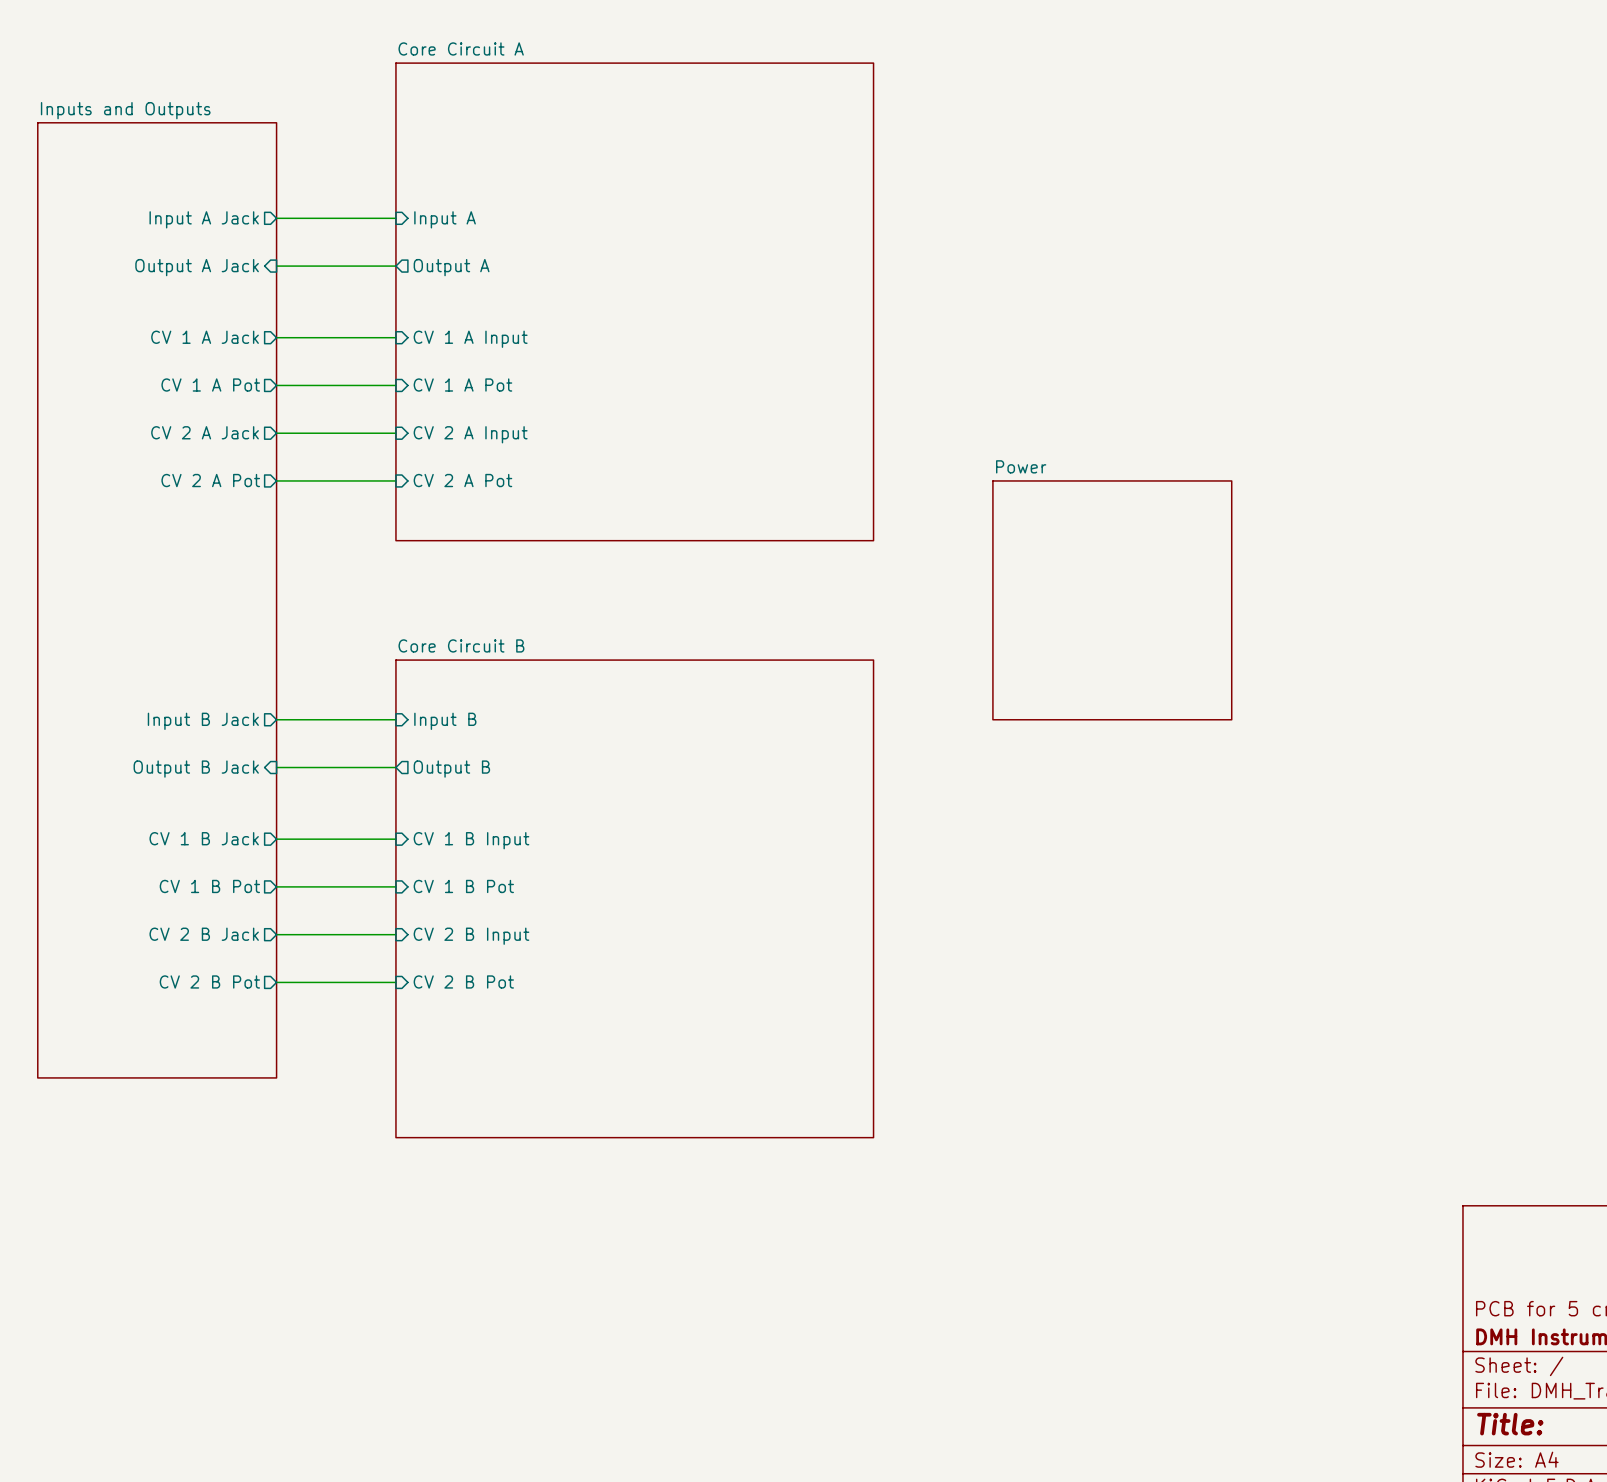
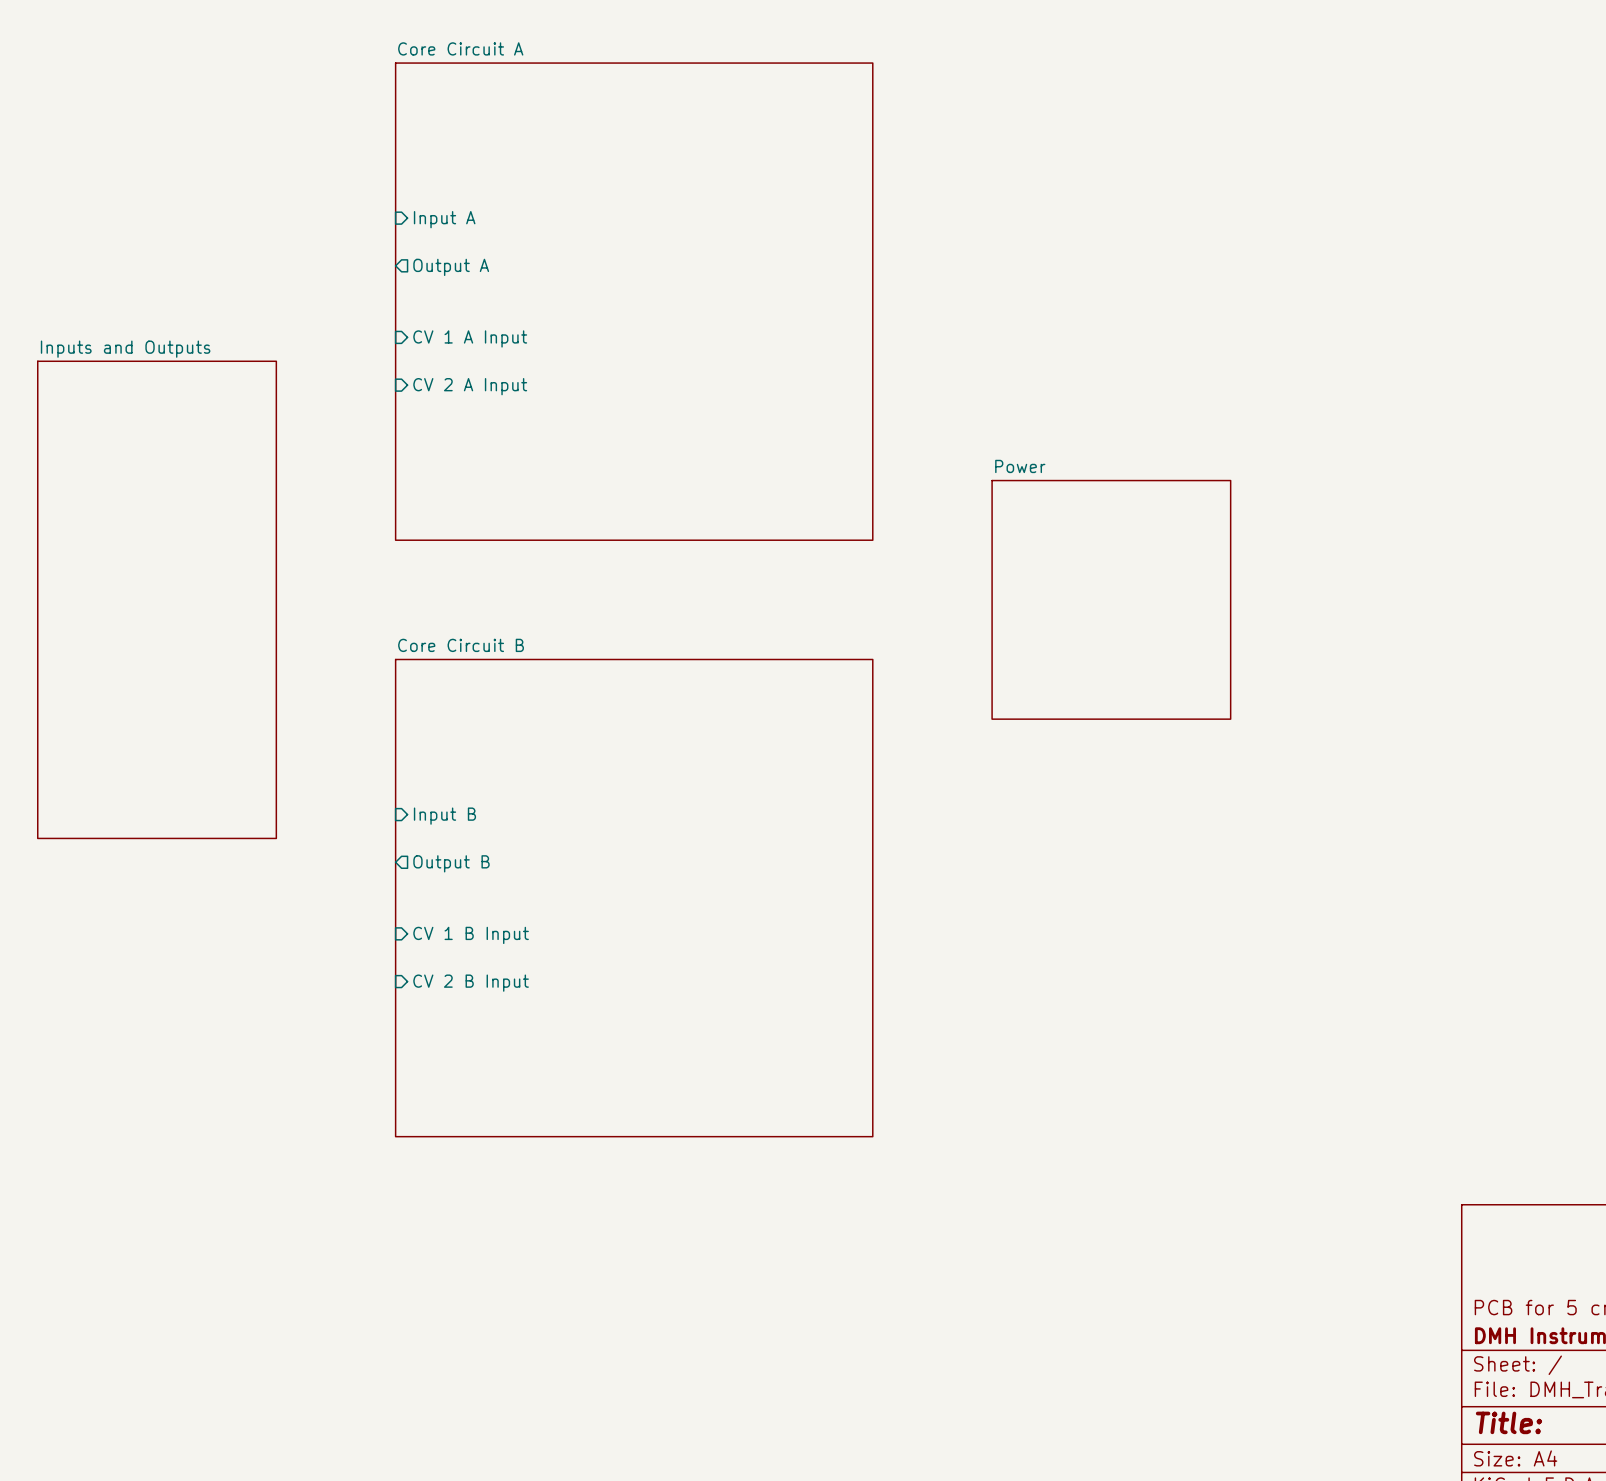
sheet Inputs and Outputs name position: Inputs and Outputs (125, 110) -> Inputs and Outputs (125, 349)
sheet Inputs and Outputs shape: [37, 122, 278, 1079] -> [37, 360, 278, 840]
wire: (276, 218) (395, 218) -> none
sheet pin: Input A Jack (204, 219) -> none
wire: (276, 266) (395, 266) -> none
sheet pin: Output A Jack (197, 267) -> none
sheet pin: CV 1 A Jack (205, 337) -> none
wire: (276, 337) (395, 337) -> none
sheet pin: CV 1 A Pot (210, 385) -> none
wire: (276, 385) (395, 385) -> none
sheet pin: CV 1 A Pot (462, 385) -> CV 2 A Input (470, 386)
sheet pin: CV 2 A Jack (205, 432) -> none
wire: (276, 433) (395, 433) -> none
sheet pin: CV 2 A Input (470, 434) -> none
sheet pin: CV 2 A Pot (210, 480) -> none
wire: (276, 480) (395, 480) -> none
sheet pin: CV 2 A Pot (462, 480) -> none
wire: (276, 719) (395, 719) -> none
sheet pin: Input B Jack (203, 721) -> none
sheet pin position: Input B (445, 721) -> Input B (444, 816)
wire: (276, 767) (395, 767) -> none
sheet pin: Output B Jack (196, 769) -> none
sheet pin position: Output B (451, 769) -> Output B (451, 863)
sheet pin: CV 1 B Jack (204, 838) -> none
wire: (276, 839) (395, 839) -> none
sheet pin: CV 1 B Input (471, 840) -> none
sheet pin: CV 1 B Pot (209, 886) -> none
wire: (276, 886) (395, 886) -> none
sheet pin: CV 1 B Pot (463, 886) -> none
sheet pin: CV 2 B Jack (204, 934) -> none
wire: (276, 934) (395, 934) -> none
sheet pin: CV 2 B Input (471, 936) -> CV 1 B Input (471, 935)
sheet pin: CV 2 B Pot (209, 981) -> none
sheet pin: CV 2 B Pot (463, 981) -> CV 2 B Input (471, 983)
wire: (276, 982) (395, 982) -> none

